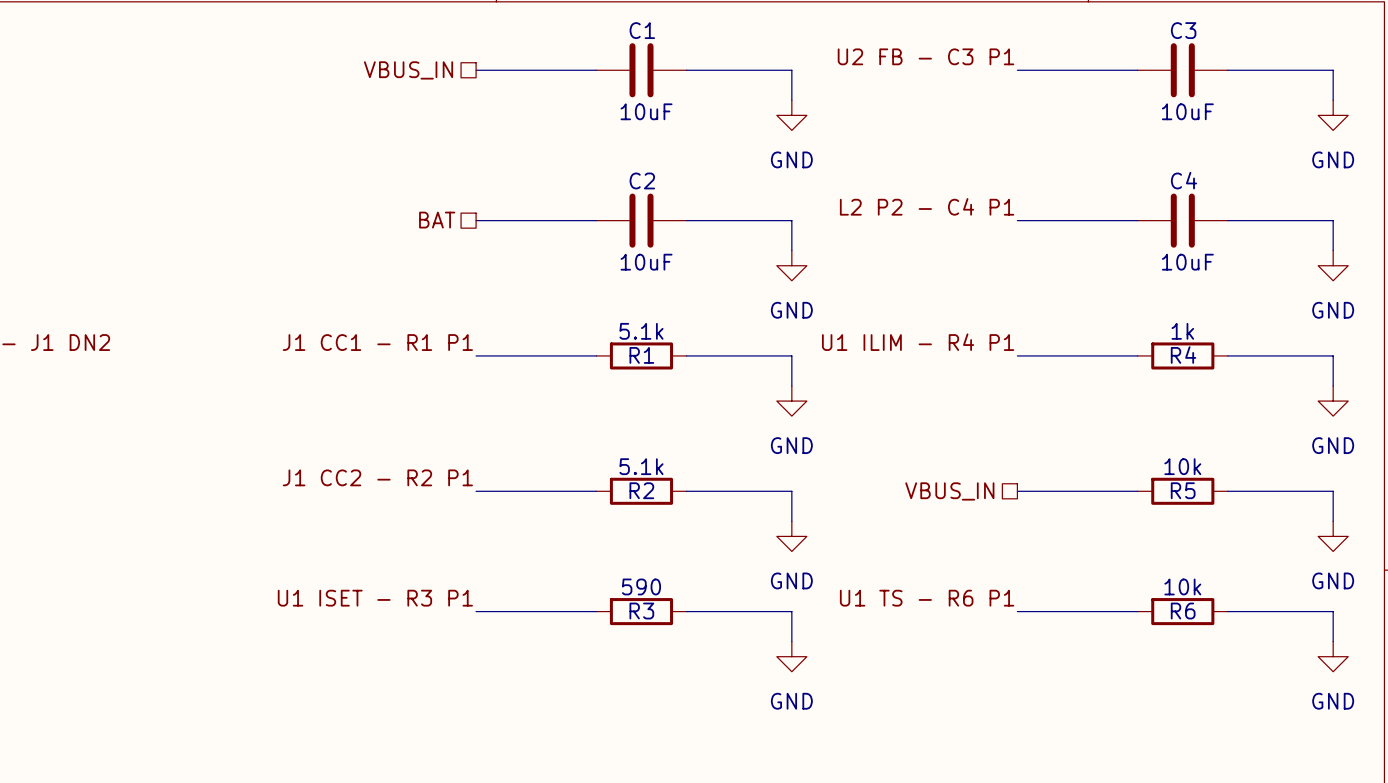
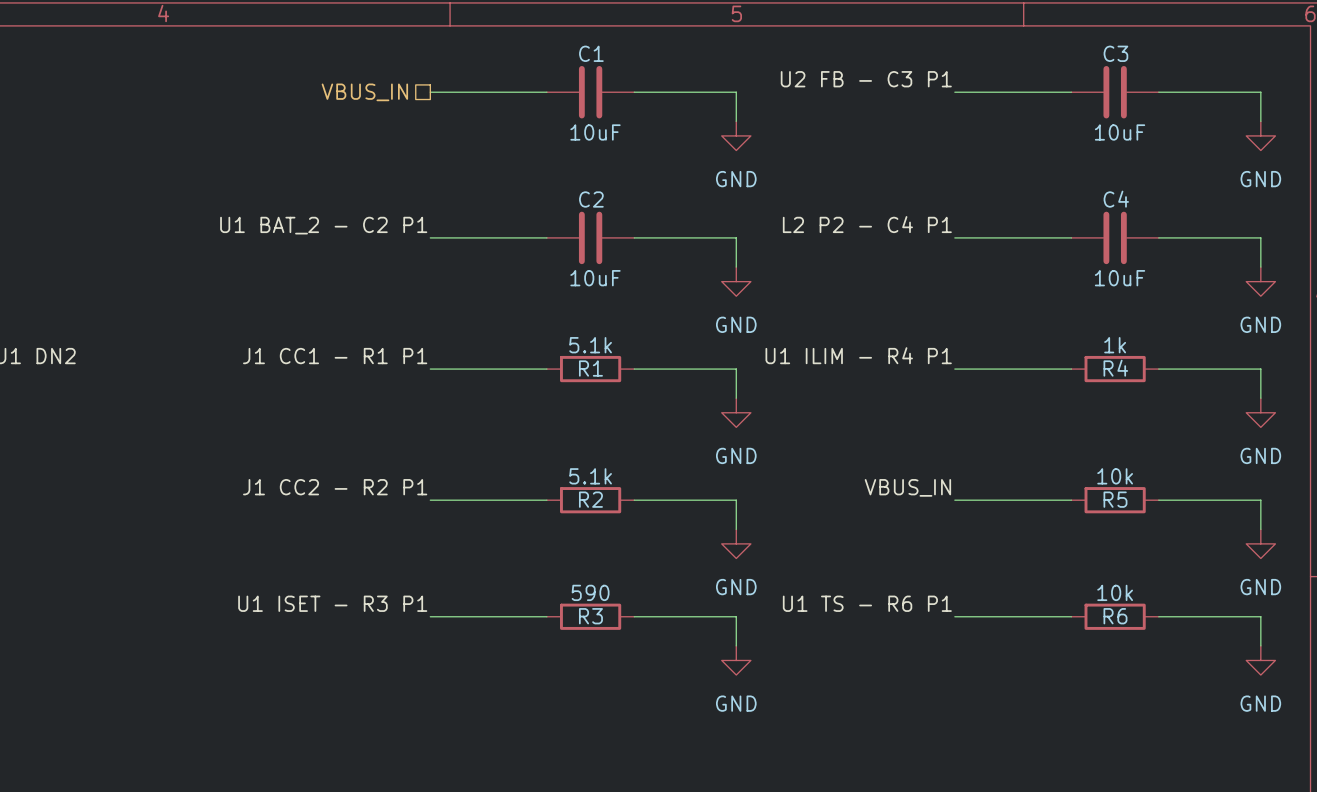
label: none -> U1 BAT_2 - C2 P1 (323, 225)
hierarchical label: BAT (437, 220) -> none
label: none -> VBUS_IN (907, 487)
hierarchical label: VBUS_IN (949, 491) -> none

